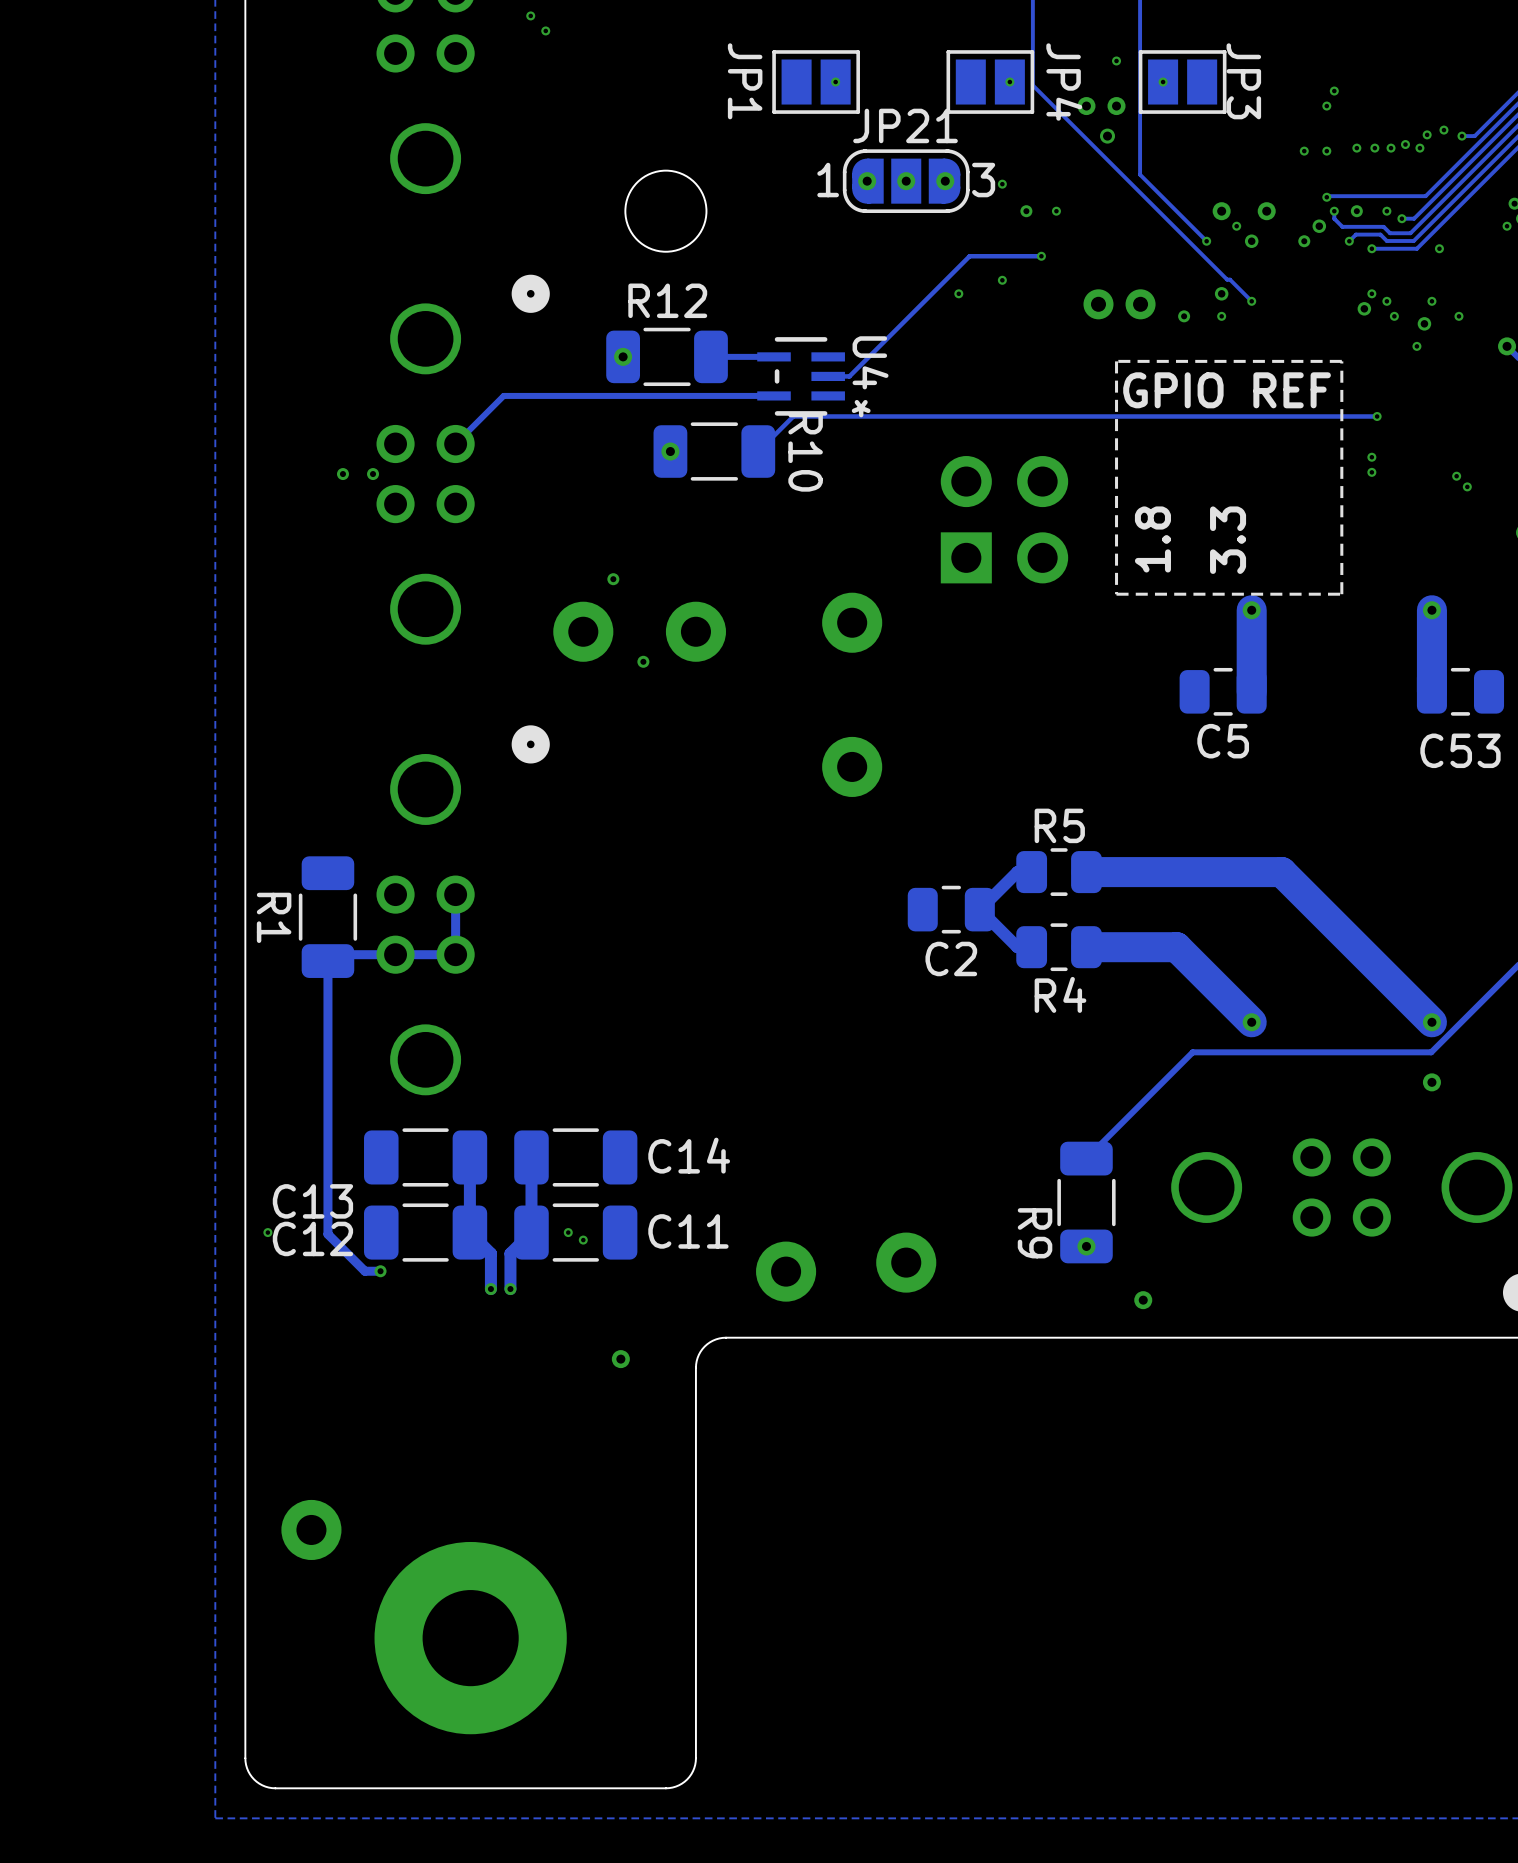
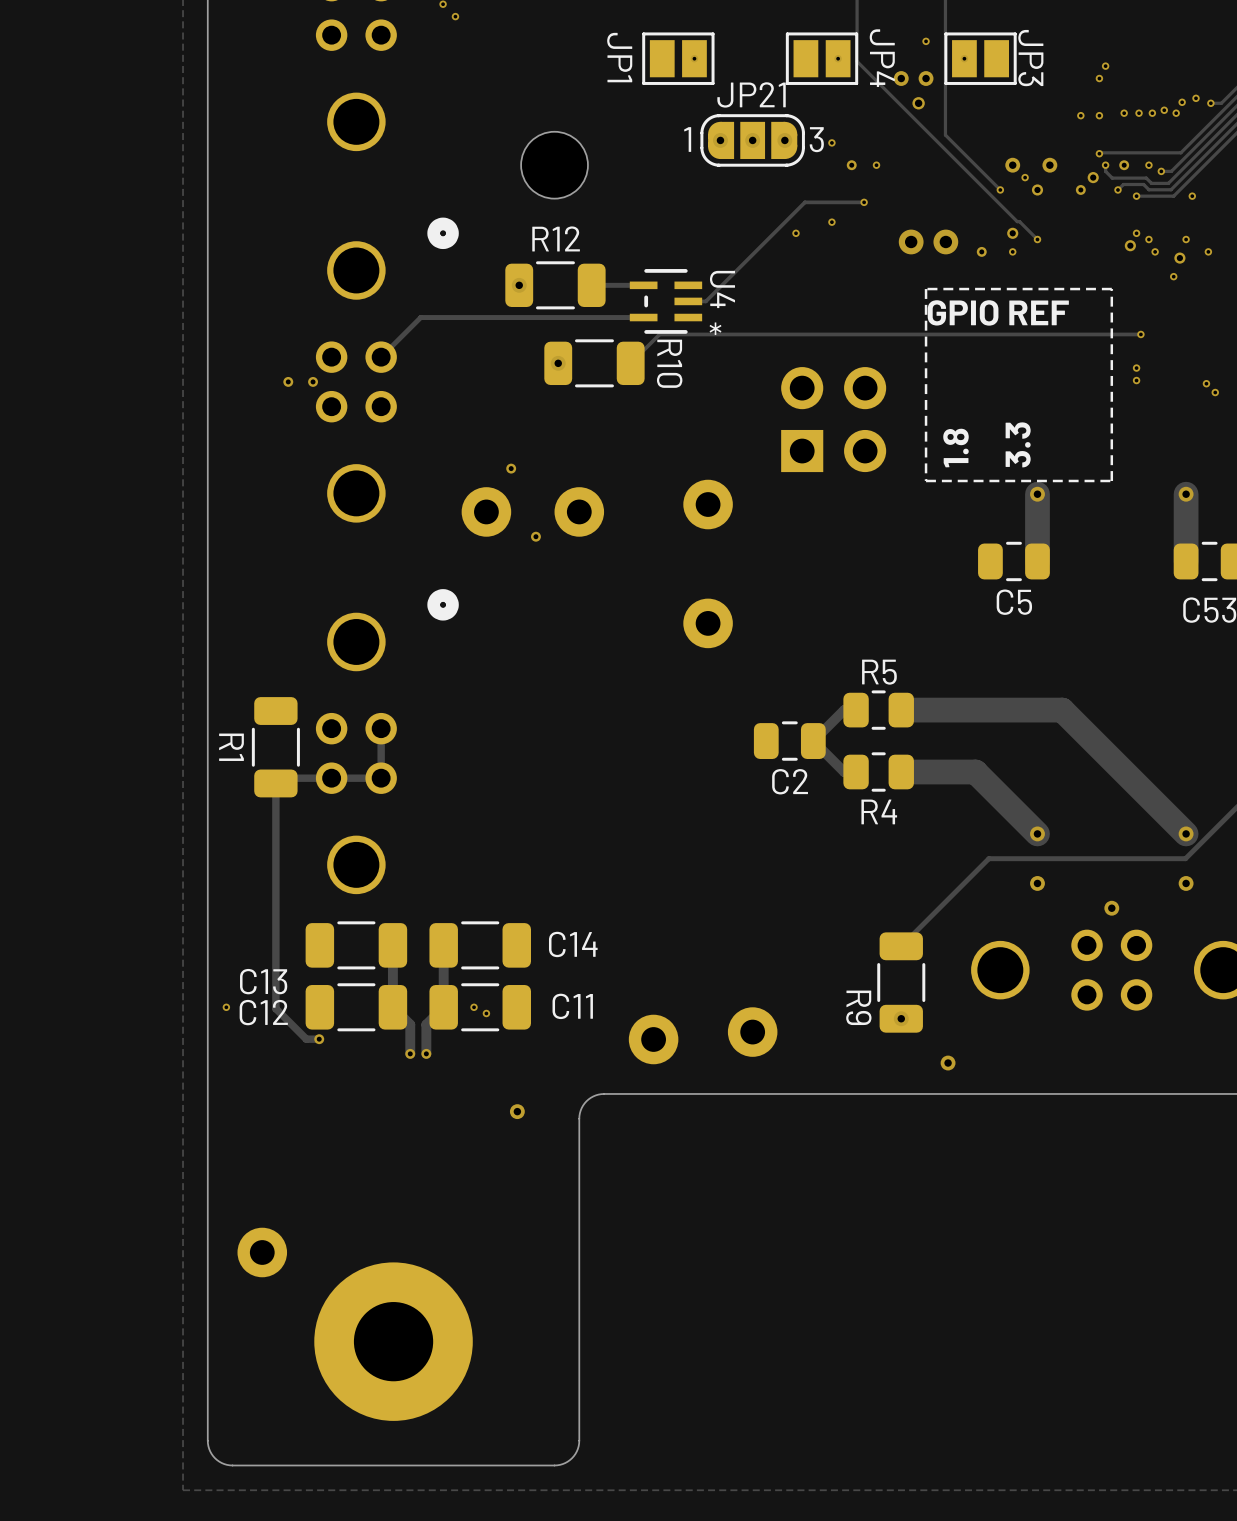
via: none -> (1037, 883)
via: none -> (1111, 908)

